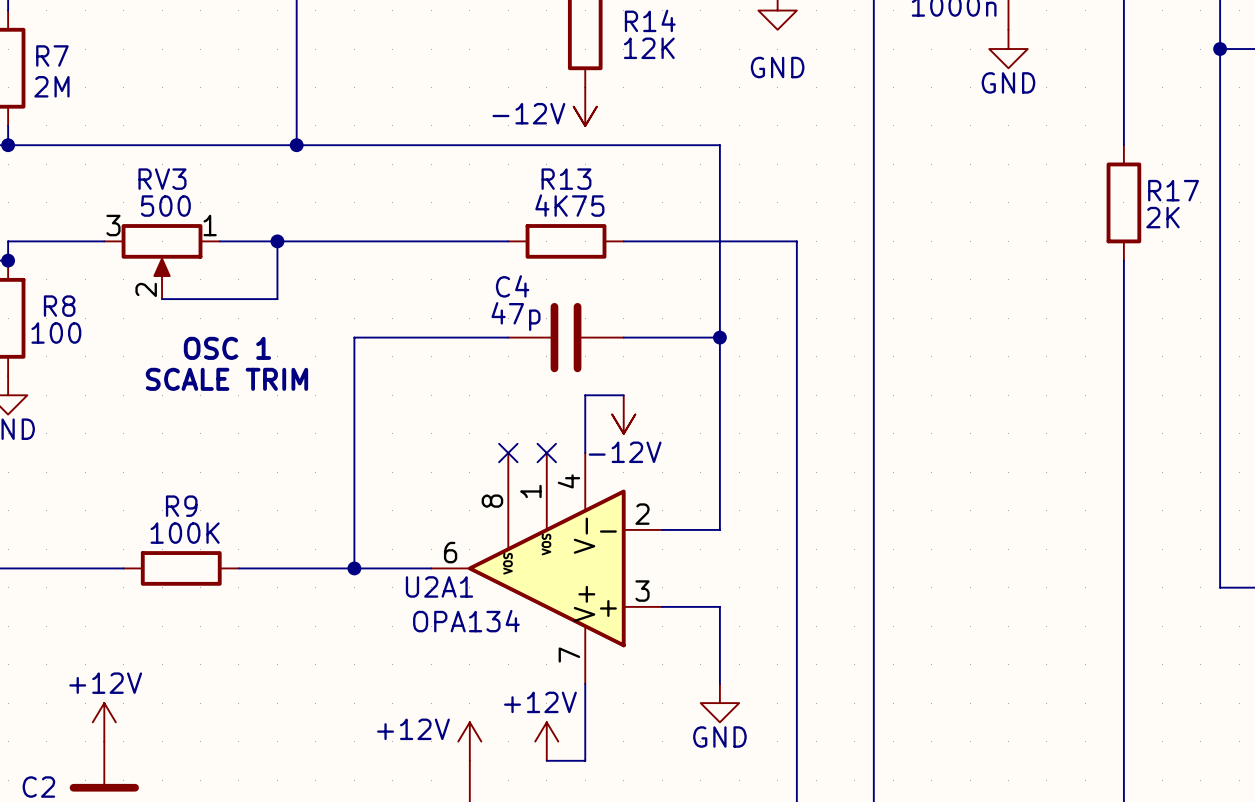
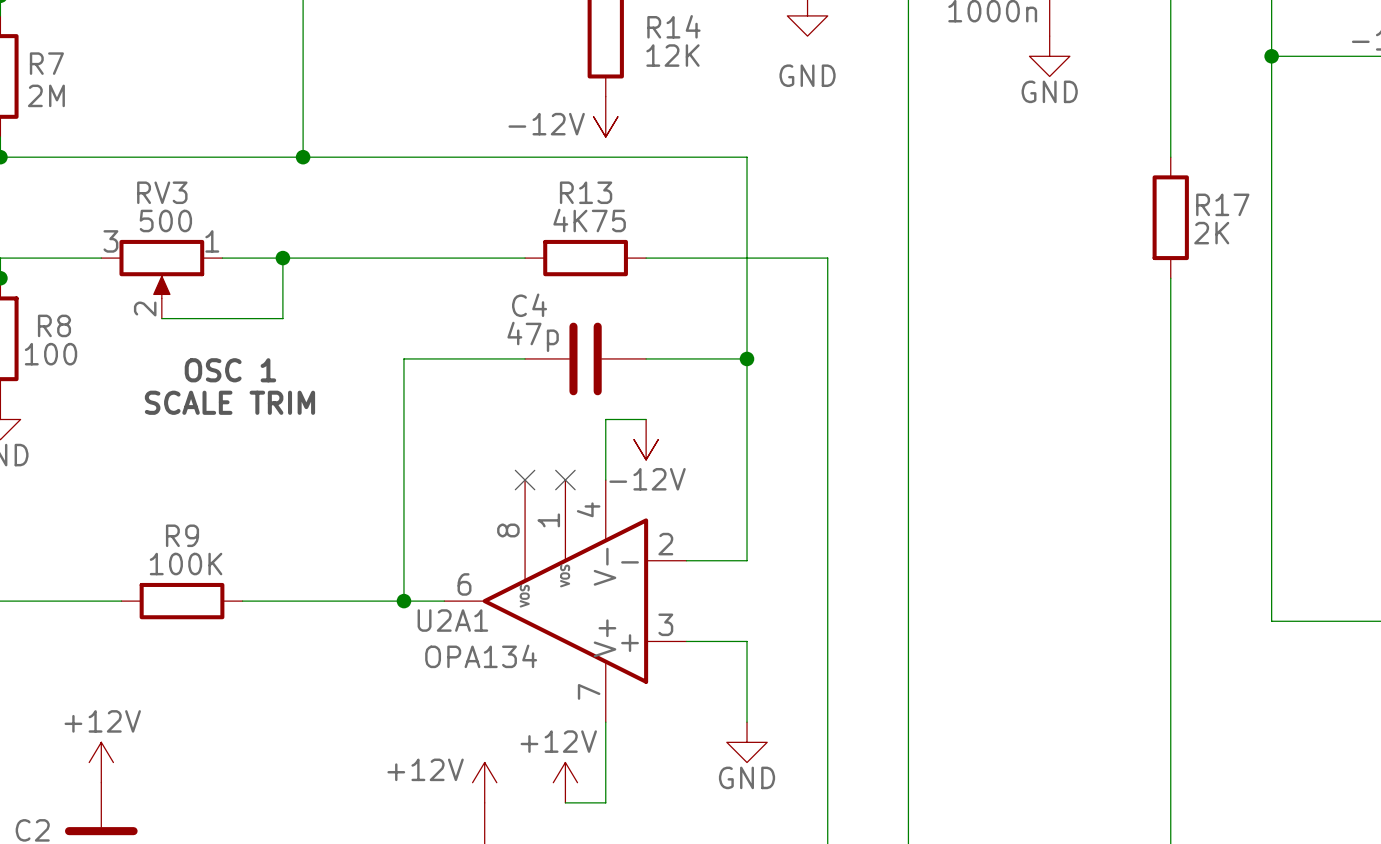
wire: (392, 337) (354, 337) (354, 568) -> (403, 358) (403, 601)
junction position: (354, 568) -> (403, 601)

